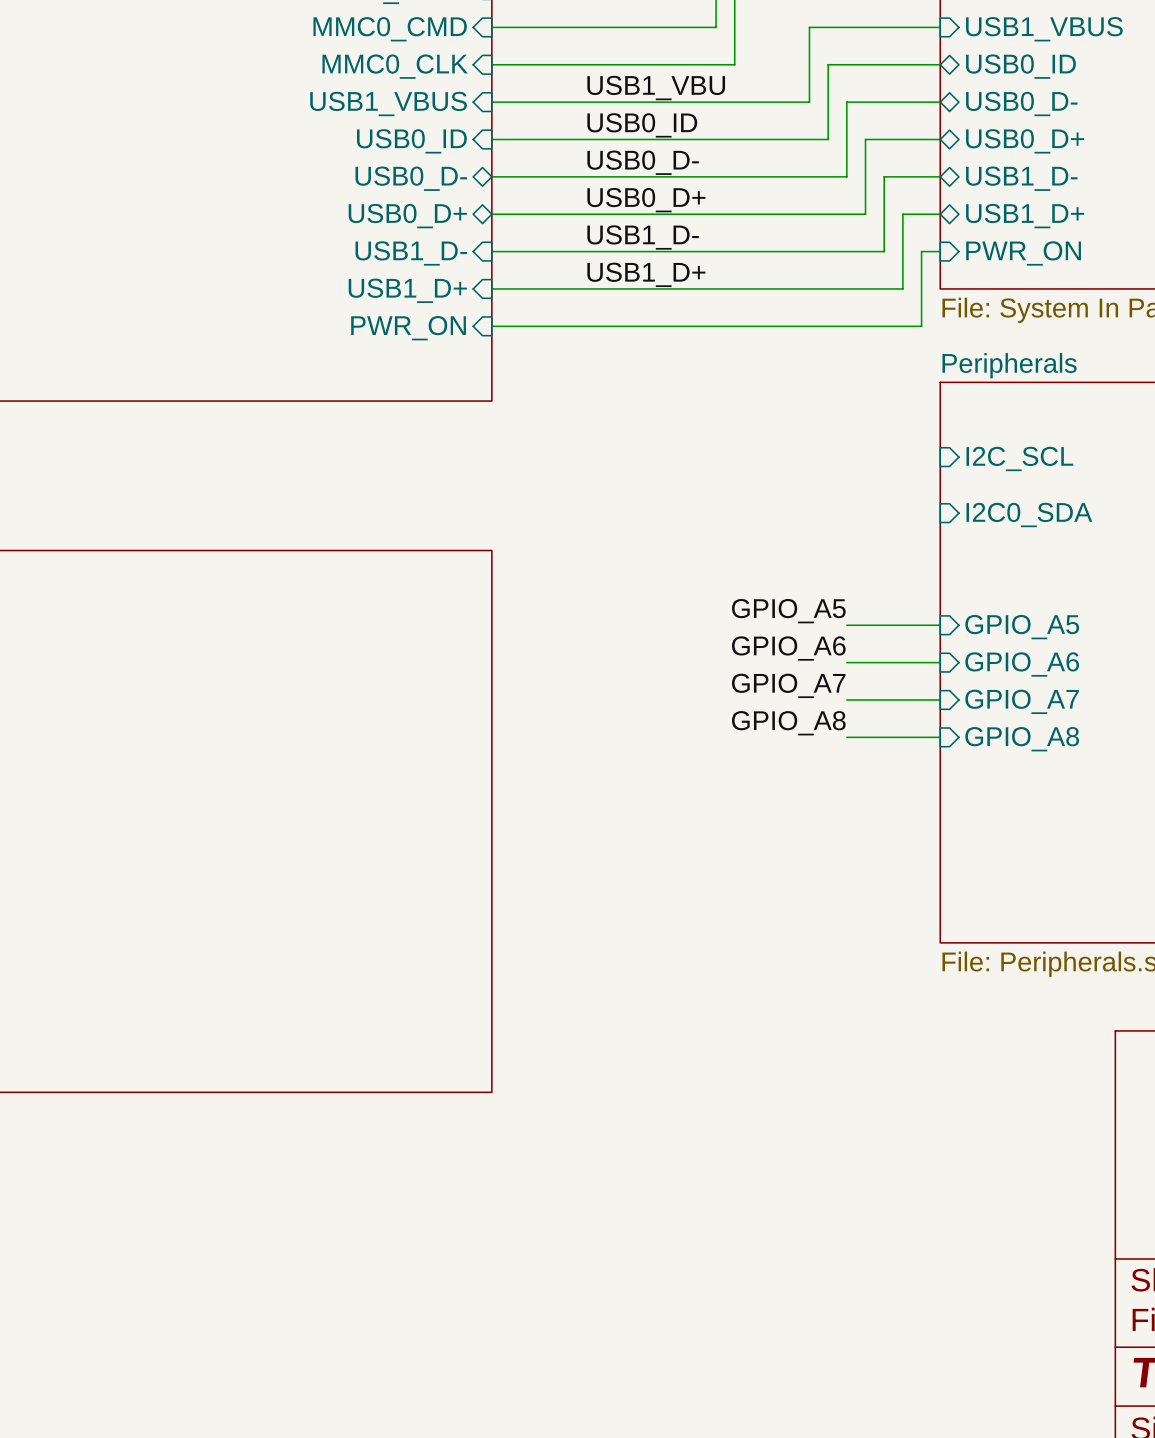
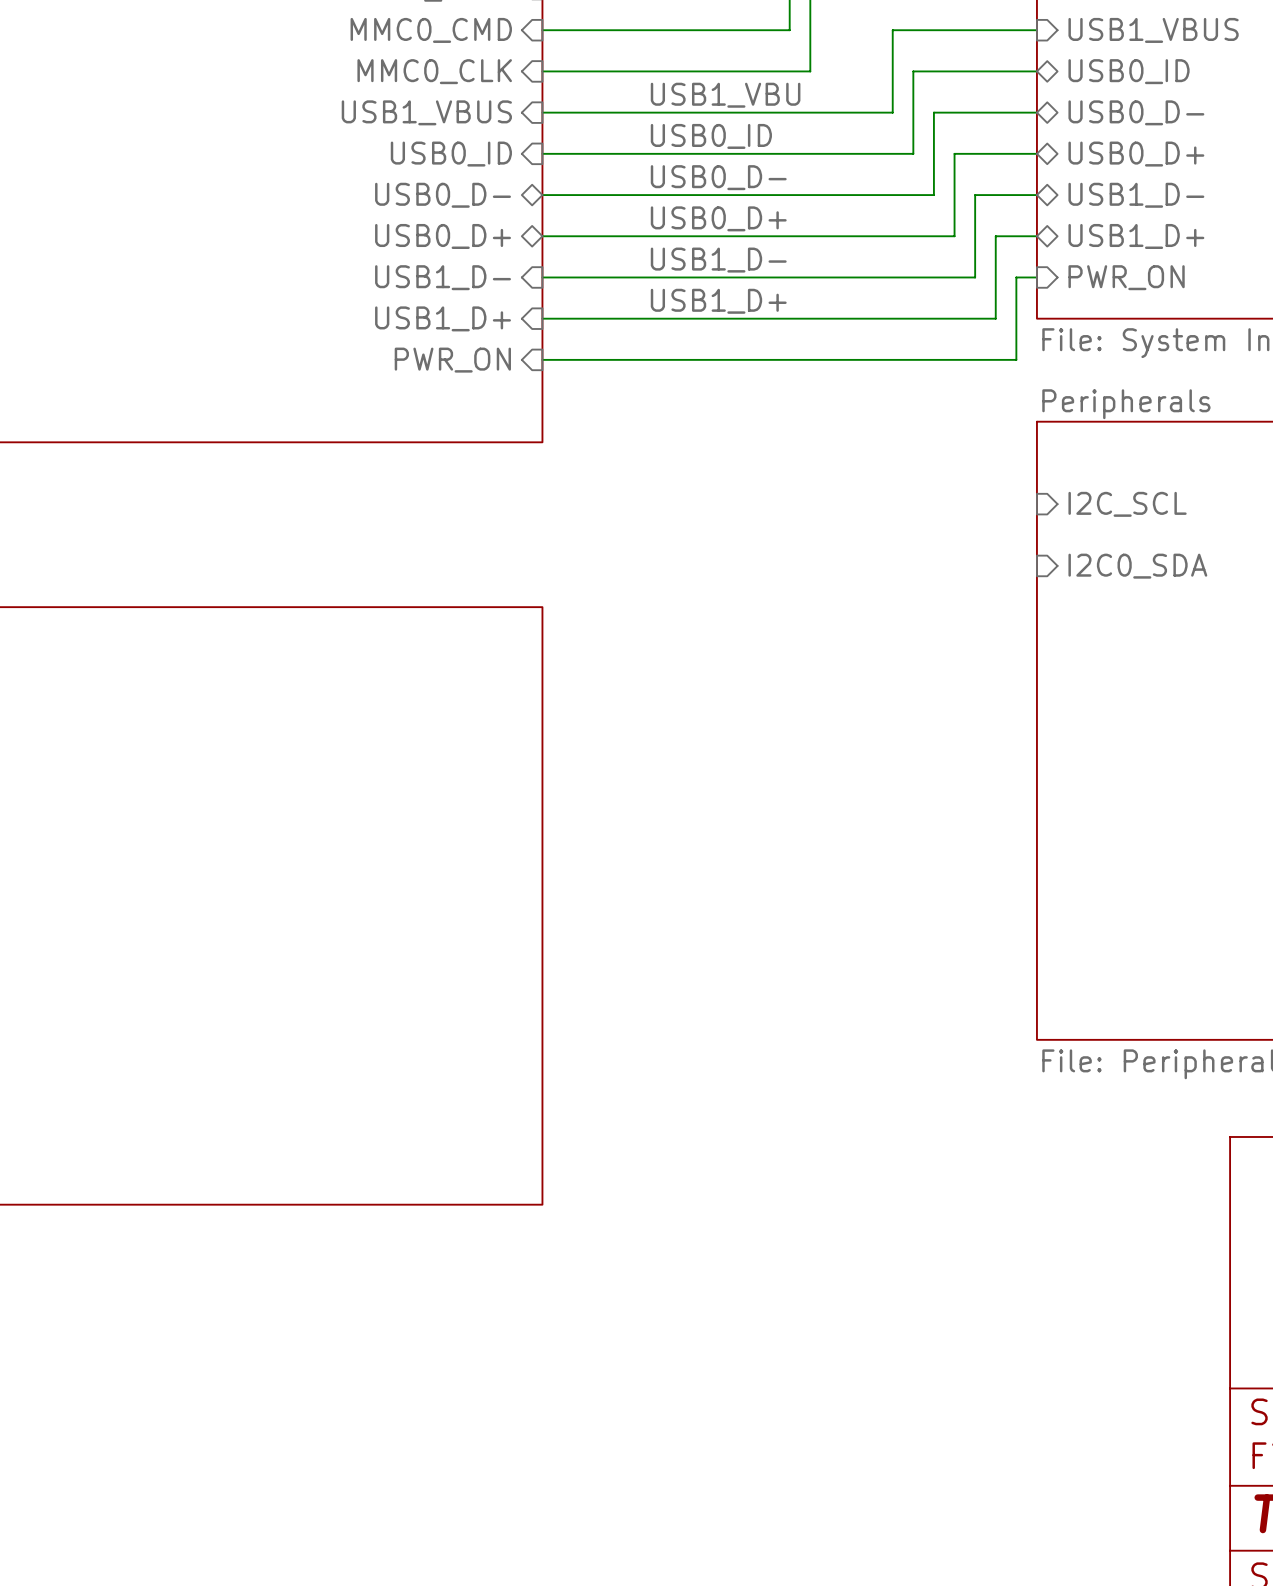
label: GPIO_A5 (788, 611) -> none
wire: (846, 625) (940, 625) -> none
sheet pin: GPIO_A5 (1022, 627) -> none
label: GPIO_A6 (788, 648) -> none
wire: (846, 662) (940, 662) -> none
sheet pin: GPIO_A6 (1022, 664) -> none
label: GPIO_A7 (788, 685) -> none
wire: (846, 699) (940, 699) -> none
sheet pin: GPIO_A7 (1022, 701) -> none
label: GPIO_A8 (788, 723) -> none
wire: (846, 737) (940, 737) -> none
sheet pin: GPIO_A8 (1022, 739) -> none

